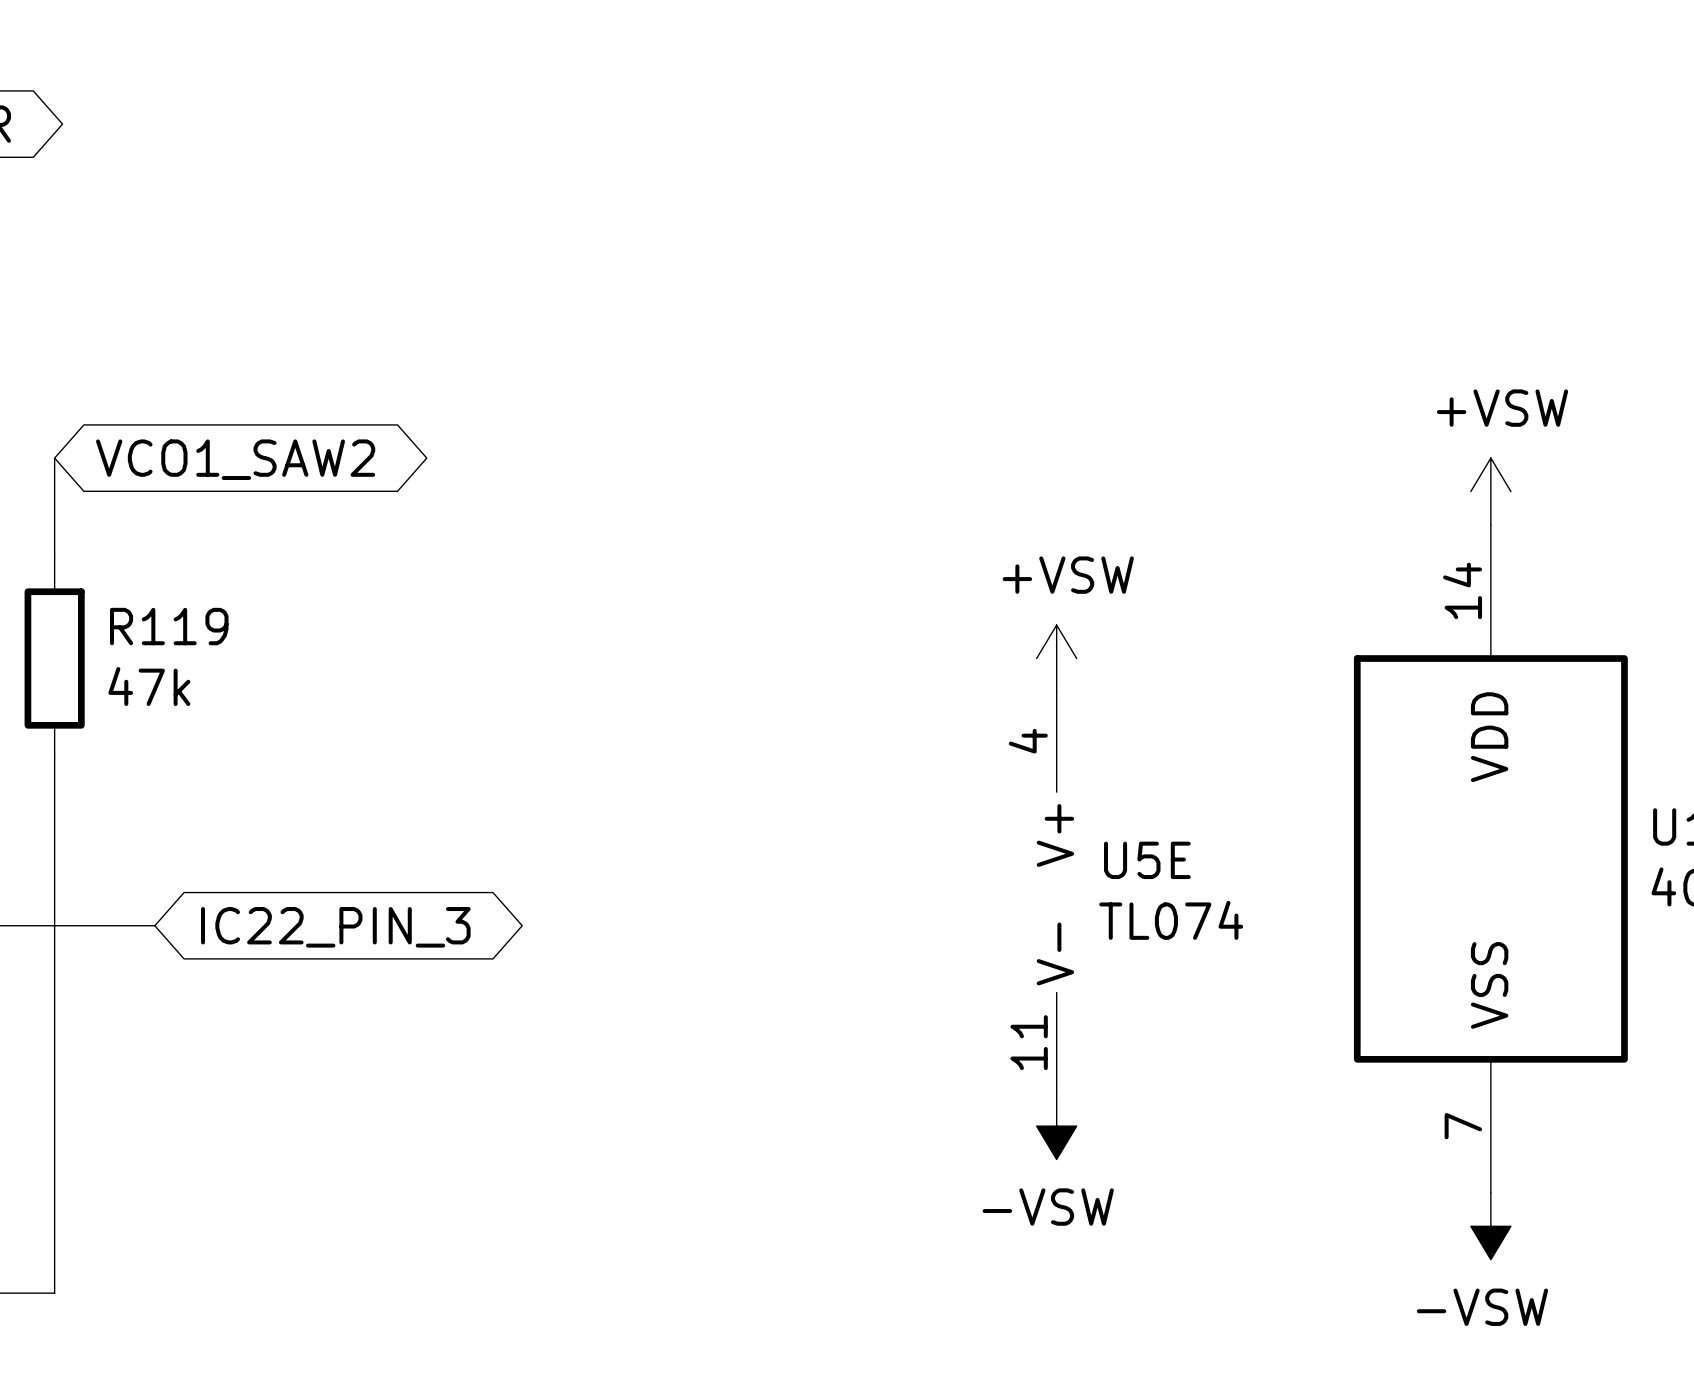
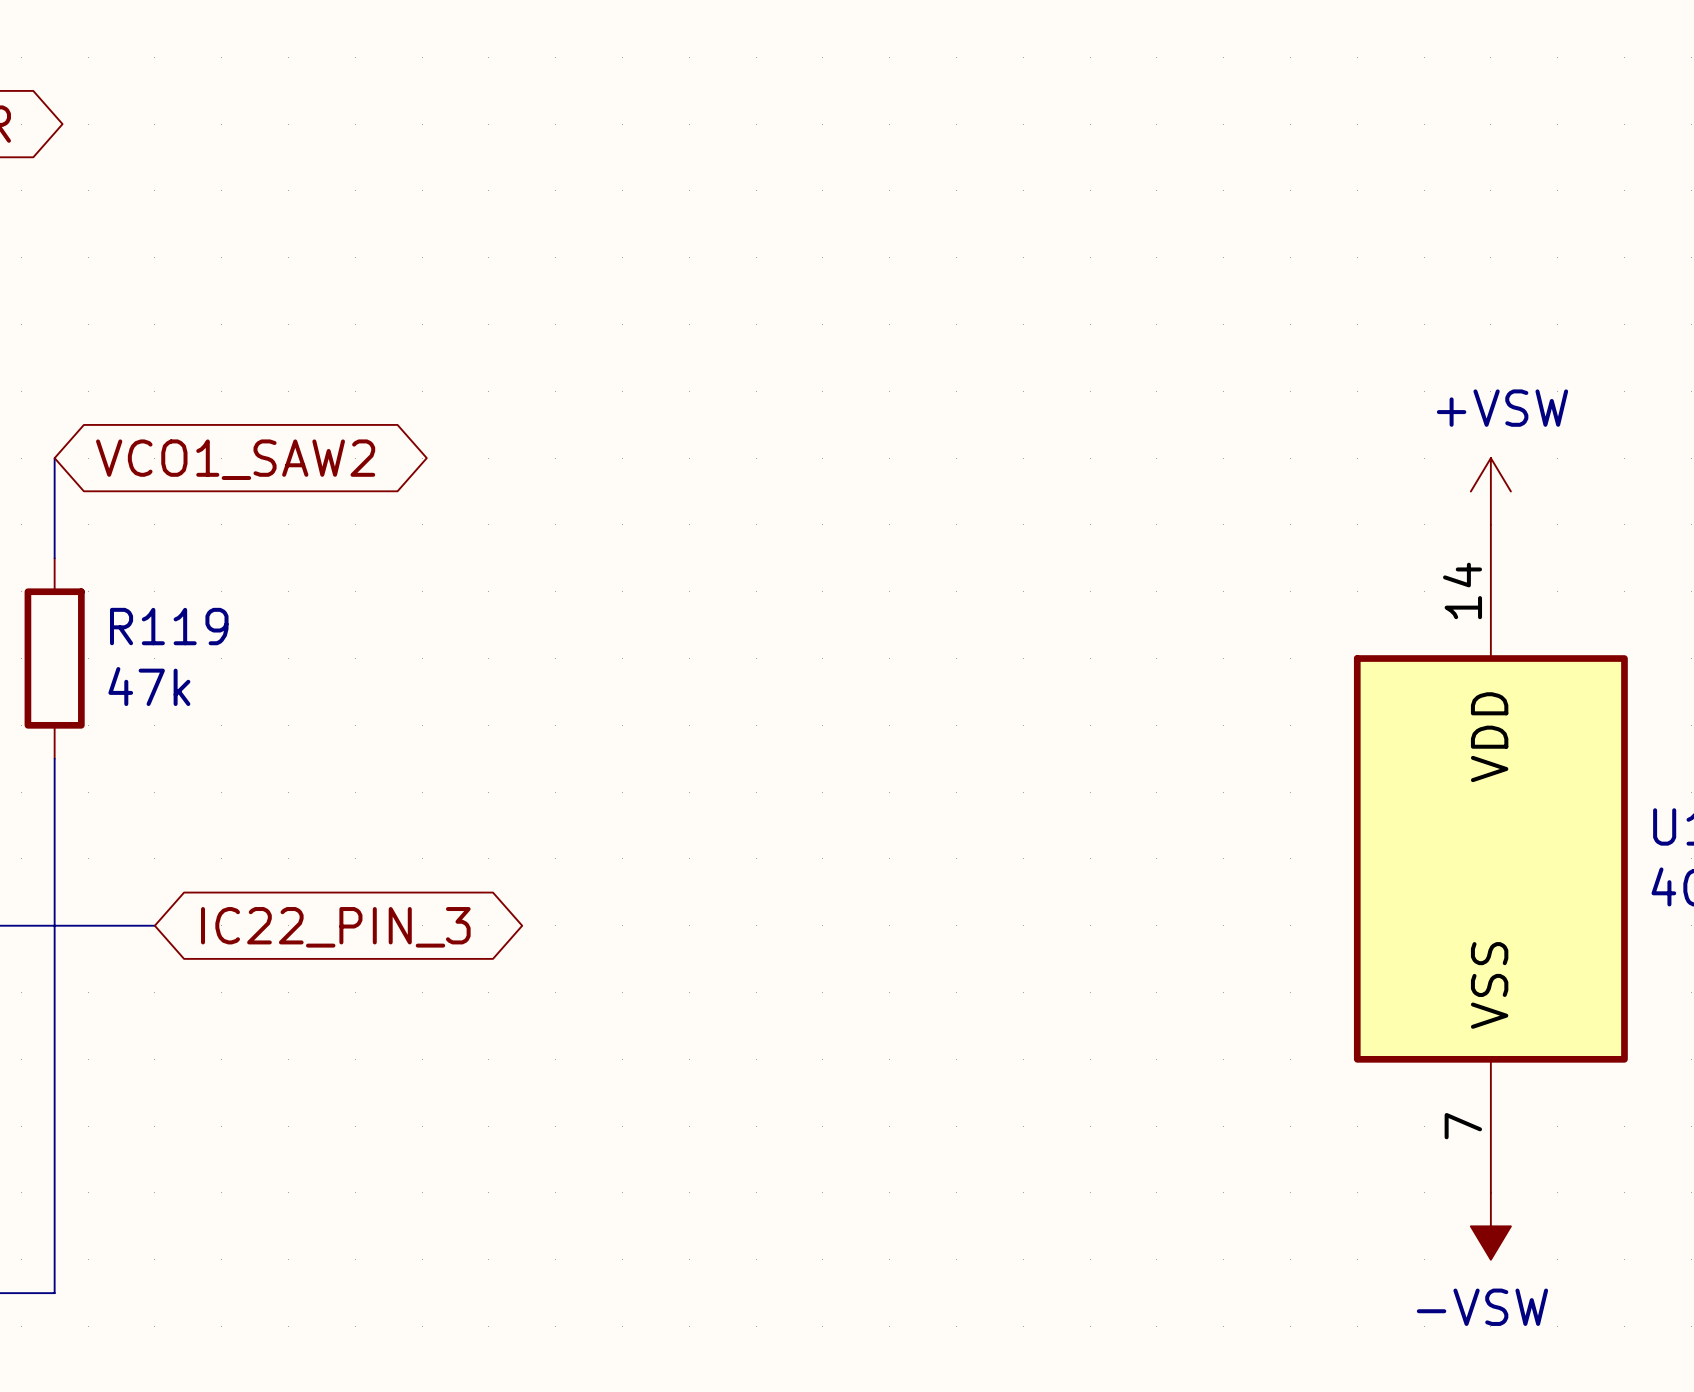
power symbol: +VSW (1056, 658) -> none
U5E: TL074 (1056, 892) -> none
power symbol: -VSW (1056, 1126) -> none

